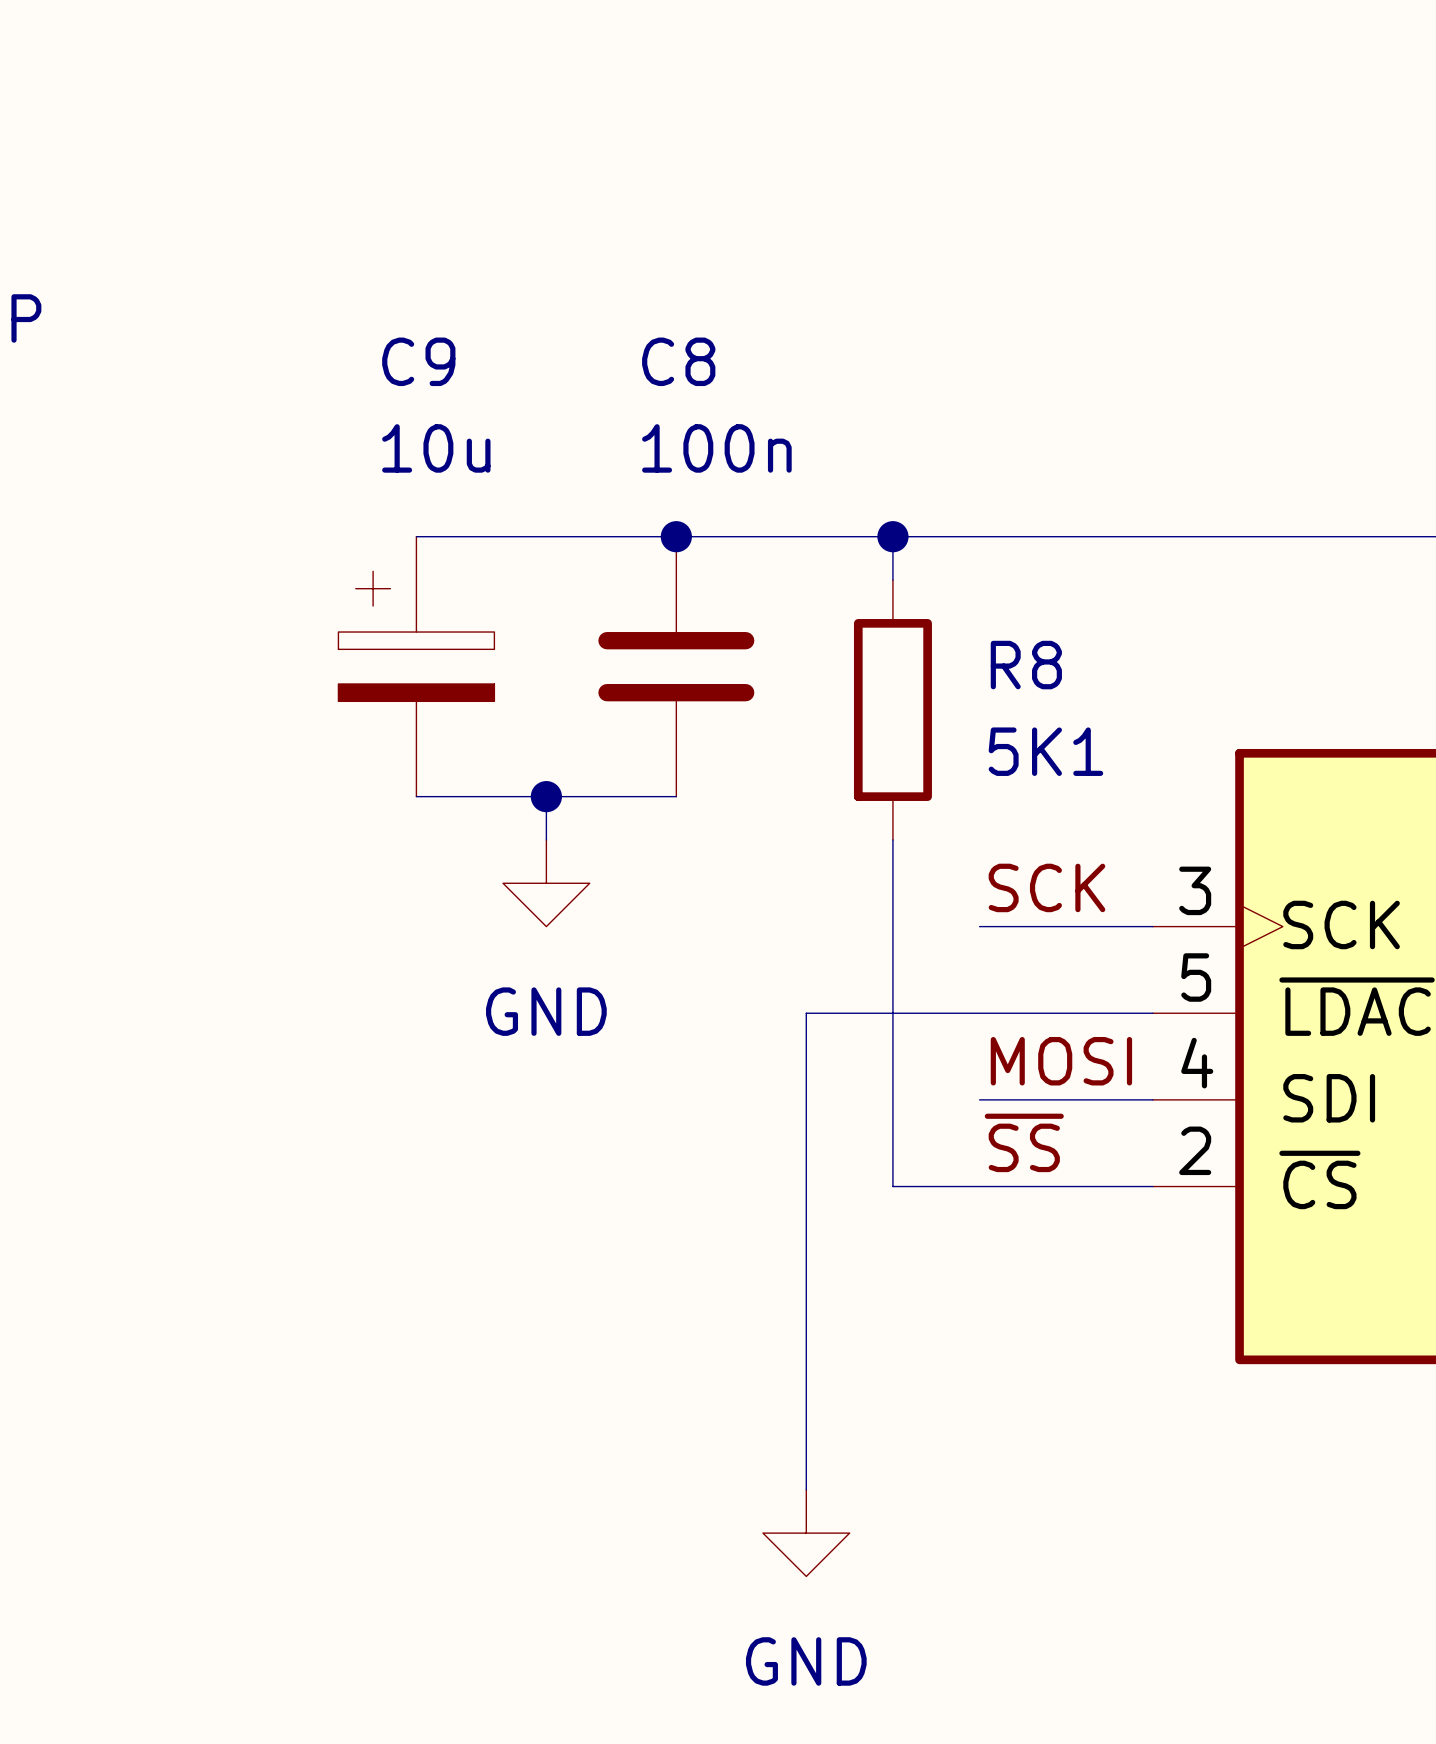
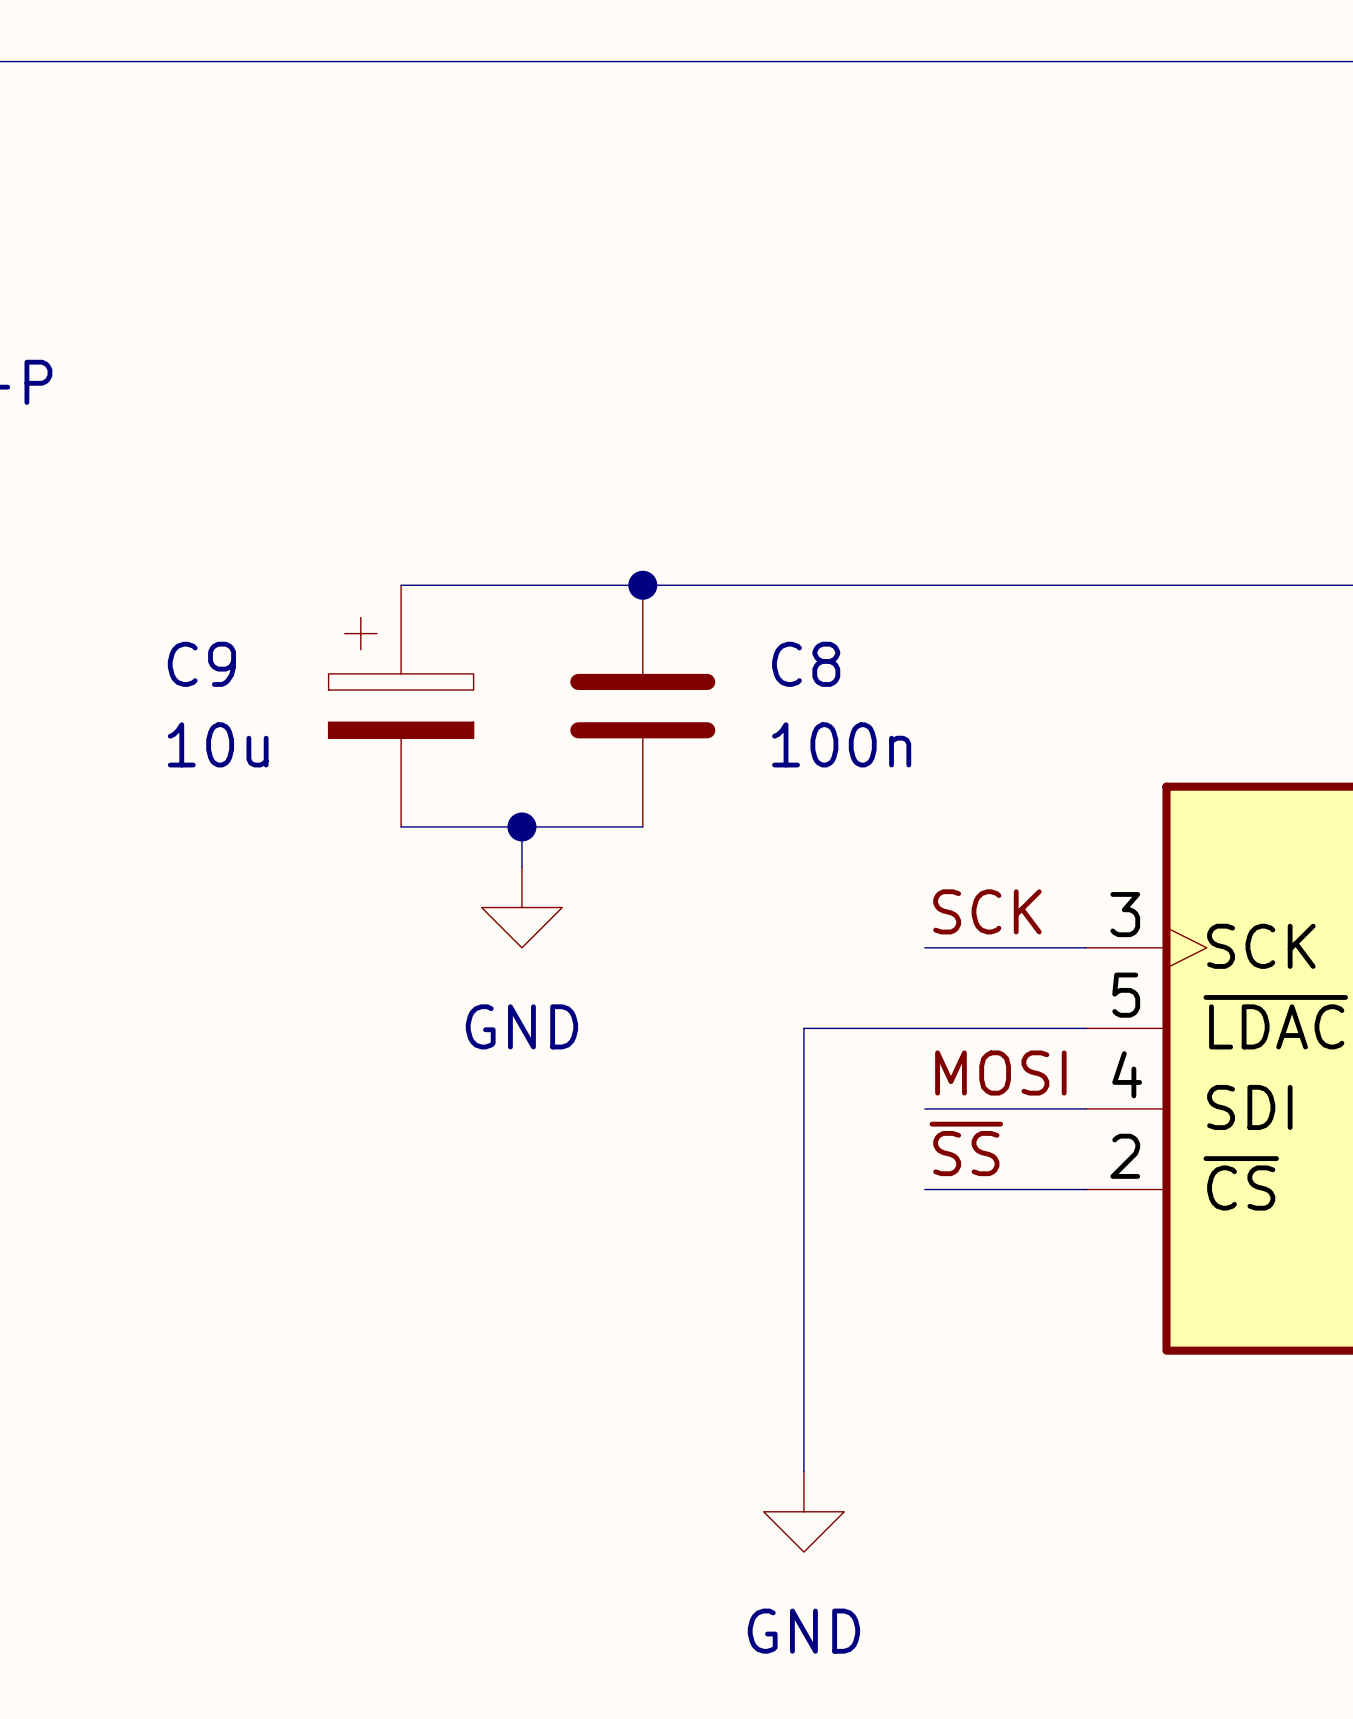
C9 name position: C9 (418, 361) -> C9 (201, 664)
C8 name position: C8 (678, 361) -> C8 (806, 664)
C9 value position: 10u (436, 448) -> 10u (218, 744)
C8 value position: 100n (716, 448) -> 100n (841, 744)
wire: (892, 536) (892, 580) -> none
junction: (892, 536) -> none
R8: 5K1 (892, 709) -> none
wire: (892, 839) (892, 1186) (979, 1186) -> none
wire: (849, 1013) (806, 1013) (806, 1489) -> (803, 1028) (803, 1471)
power symbol position: GND (806, 1533) -> GND (803, 1511)

